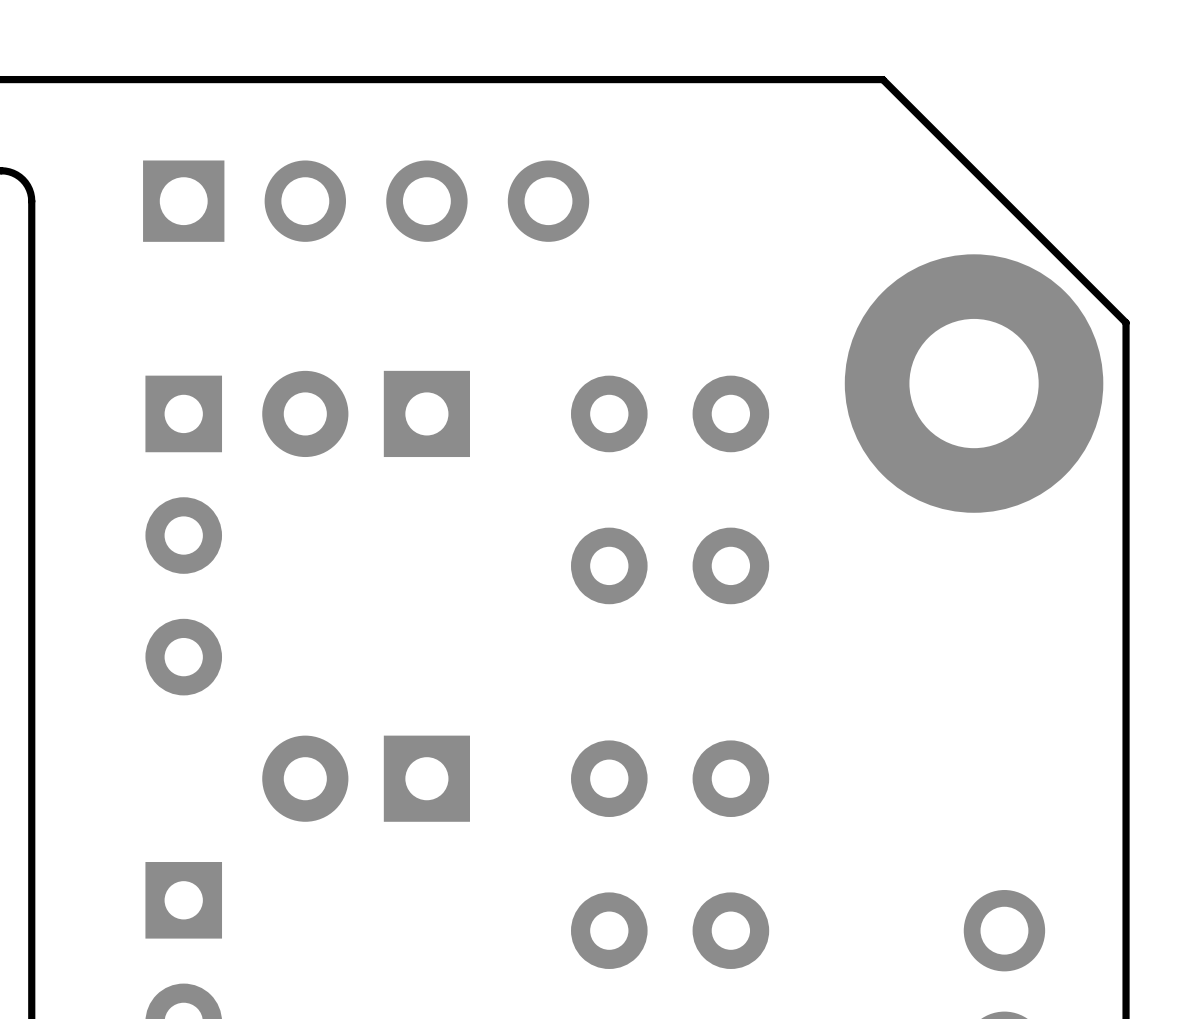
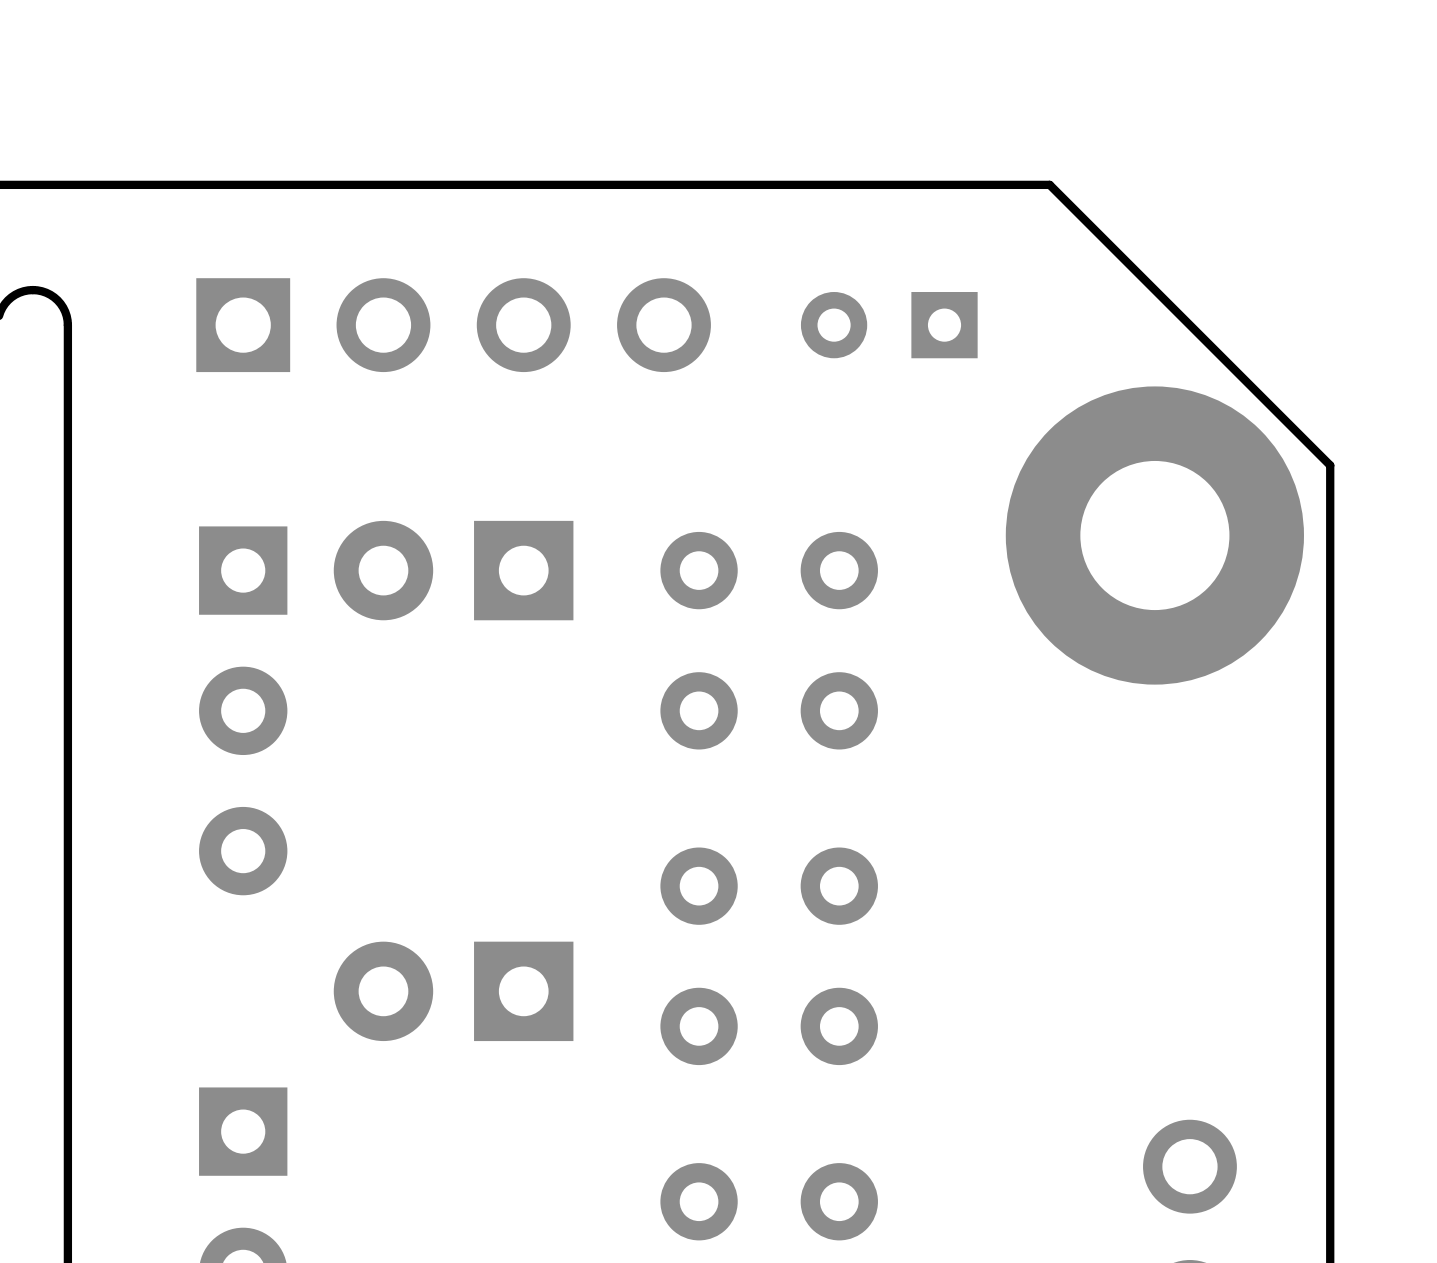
part: none -> (889, 325)
part footprint: [570, 375, 770, 453] -> [660, 531, 878, 610]
part footprint: [570, 527, 770, 605] -> [660, 672, 878, 750]
part: none -> (769, 886)
part footprint: [570, 740, 770, 818] -> [660, 987, 878, 1066]
part footprint: [570, 892, 770, 969] -> [660, 1163, 878, 1241]

